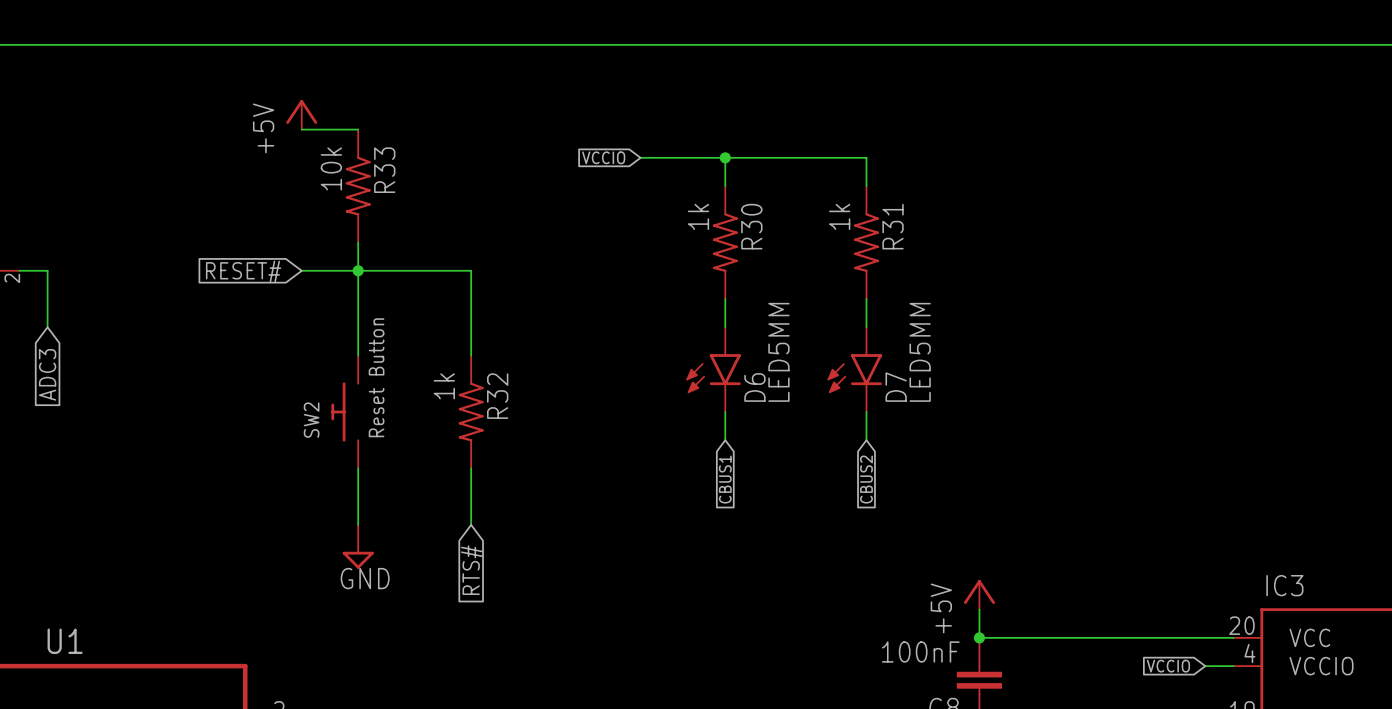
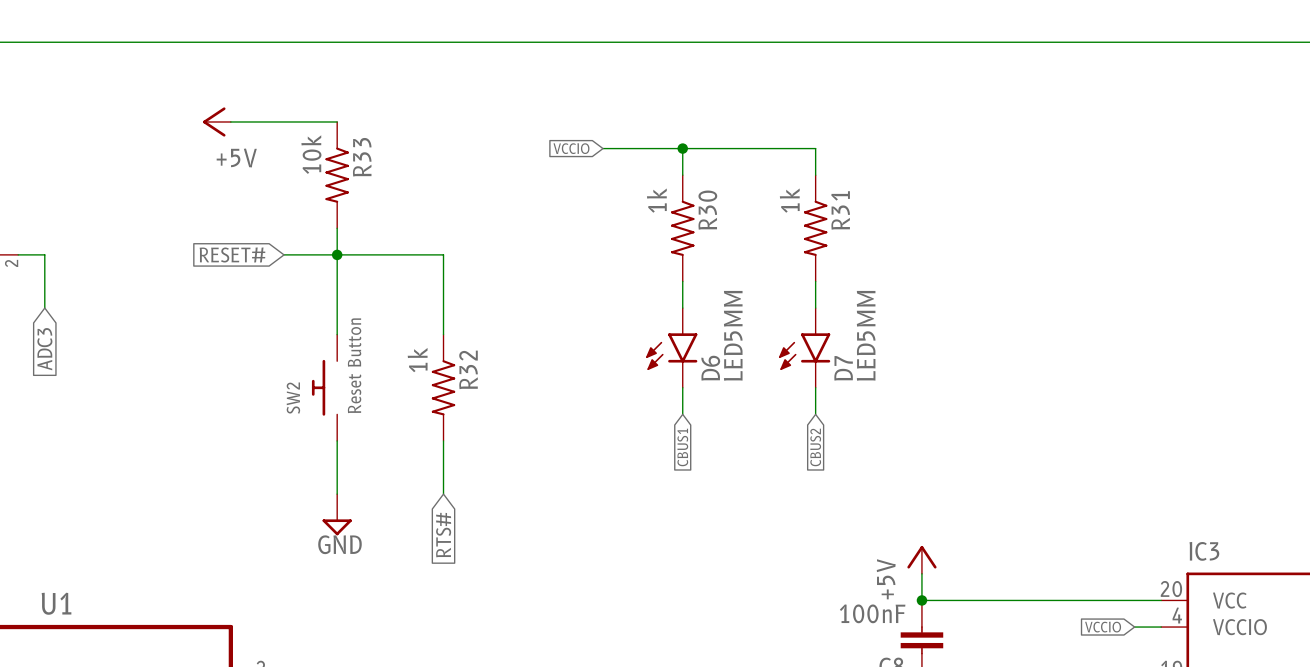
power symbol rotation: 0° (301, 111) -> 90° counterclockwise (214, 121)
power symbol position: +5V (301, 114) -> +5V (216, 121)
wire: none -> (230, 121) (284, 121)

